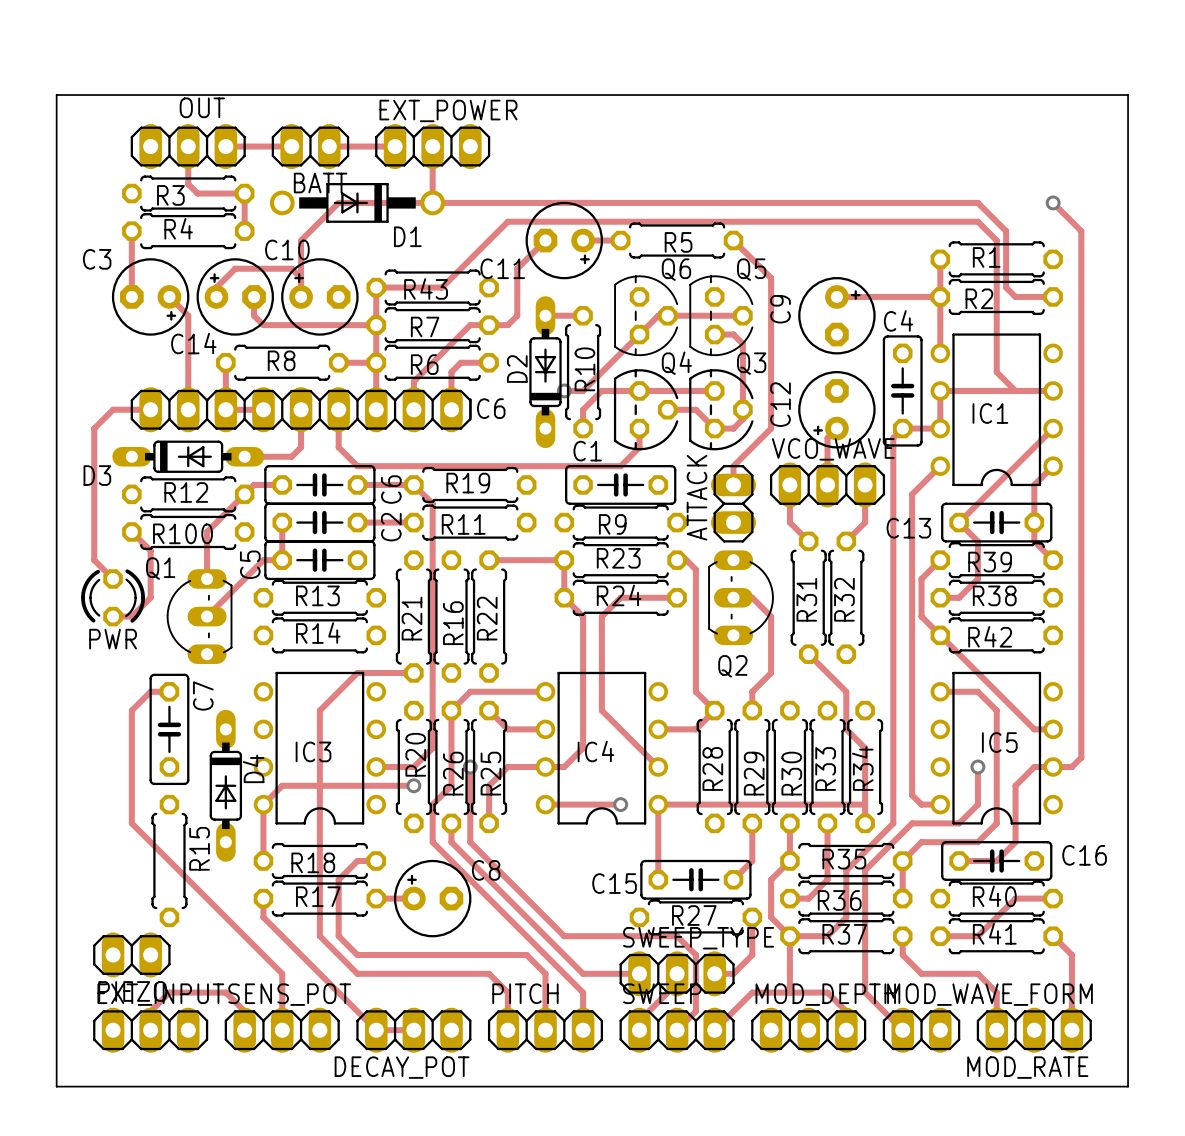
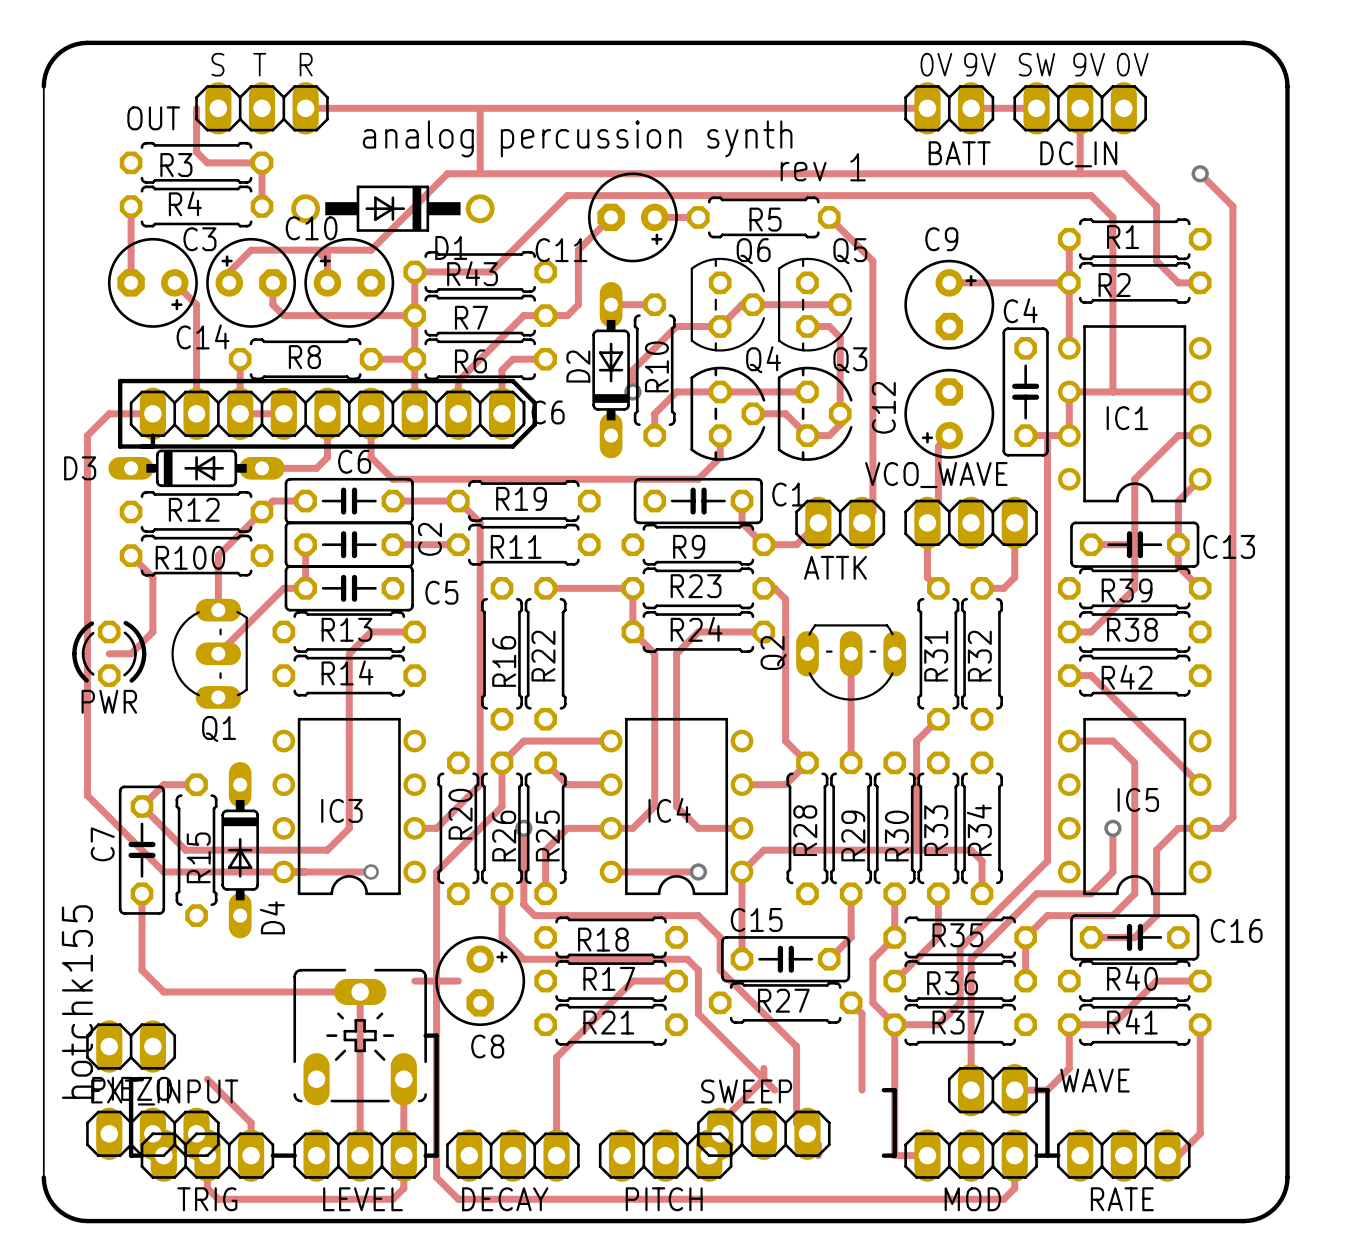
OUT name position: OUT (202, 107) -> OUT (153, 118)
text: none -> S (217, 64)
text: none -> T (259, 64)
text: none -> R (306, 64)
text: none -> 0V (936, 64)
text: none -> 9V (980, 64)
text: none -> SW (1036, 64)
text: none -> 9V (1089, 64)
text: none -> 0V (1132, 64)
board edge: (56, 127) (56, 95) (1128, 95) (1128, 1086) (56, 1086) (56, 1067) -> (43, 86) (47, 69) (56, 55) (70, 46) (87, 42) (1243, 42) (1260, 46) (1274, 55) (1284, 69) (1287, 86) (1287, 1177) (1284, 1194) (1274, 1208) (1260, 1217) (1243, 1221) (87, 1221) (70, 1217) (56, 1208) (47, 1194) (43, 1177)
OUT position: (188, 146) -> (262, 108)
track: (225, 146) (282, 146) -> none
track: none -> (316, 108) (360, 108)
BATT: (310, 146) -> none
track: none -> (436, 108) (927, 108)
EXT_POWER: (432, 146) -> none
BATT: none -> (949, 108)
track: none -> (971, 108) (1036, 108)
track: none -> (1080, 108) (1080, 173)
DC_IN: none -> (1080, 108)
text: none -> analog percussion synth (577, 138)
text: none -> rev 1 (823, 167)
D1 position: (357, 202) -> (392, 208)
track: (404, 202) (338, 202) (301, 240) (301, 268) -> (447, 173) (371, 250) (316, 250)
track: (977, 202) (1006, 231) (1006, 287) (1015, 296) (1034, 296) -> (1112, 173) (1123, 173) (1156, 206) (1156, 261) (1178, 282)
track: (959, 221) (977, 221) (996, 240) (996, 372) (1015, 390) -> (1091, 195) (1112, 217) (1112, 391)
C3 name position: C3 (97, 259) -> C3 (199, 239)
Q6 name position: Q6 (676, 269) -> Q6 (753, 251)
C9 name rotation: 0° (780, 309) -> 90° clockwise (941, 239)
C9 name position: C9 (780, 309) -> C9 (941, 239)
track: (639, 334) (583, 390) (564, 390) -> (720, 326) (676, 326) (632, 370) (632, 391)
line: none -> (120, 381) (512, 381) (534, 402) (534, 424) (512, 446) (120, 446) (120, 381)
line: none -> (152, 435) (152, 446)
track: (771, 428) (733, 466) (733, 484) -> (872, 435) (872, 511) (862, 522)
track: (902, 428) (893, 437) (893, 503) -> none
track: (1053, 428) (959, 522) (977, 541) (977, 578) -> (1200, 435) (1178, 435) (1134, 479) (1134, 588) (1112, 610)
VCO_WAVE name position: VCO_WAVE (833, 449) -> VCO_WAVE (936, 475)
C1 name position: C1 (587, 451) -> C1 (788, 494)
track: (940, 466) (912, 494) (912, 795) (921, 804) (940, 804) -> none
D3 name position: D3 (97, 475) -> D3 (80, 468)
track: none -> (742, 501) (742, 522) (763, 544) (796, 544) (818, 522)
track: (789, 484) (789, 522) (808, 541) -> none
VCO_WAVE position: (827, 484) -> (971, 522)
track: (865, 484) (865, 522) (846, 541) -> none
C6 name rotation: 0° (391, 489) -> 90° clockwise (354, 461)
C6 name position: C6 (391, 489) -> C6 (354, 461)
ATTACK: (733, 503) -> none
ATTK: none -> (840, 522)
track: none -> (927, 522) (927, 577) (938, 588)
track: none -> (1091, 544) (1134, 544)
C2 name position: C2 (391, 527) -> C2 (430, 539)
C13 name position: C13 (908, 528) -> C13 (1229, 546)
track: (893, 550) (893, 823) -> (1047, 653) (1047, 861) (1014, 893)
track: none -> (1014, 577) (1003, 588) (982, 588)
track: (94, 560) (113, 578) -> (87, 588) (87, 795) (163, 871) (371, 871)
track: (940, 560) (921, 578) -> (1047, 435) (1047, 610)
C5 name rotation: 0° (250, 564) -> 90° clockwise (441, 592)
C5 name position: C5 (250, 564) -> C5 (441, 592)
Q1 name position: Q1 (160, 568) -> Q1 (219, 729)
PWR position: (113, 597) -> (109, 653)
track: (733, 597) (752, 597) (771, 616) (771, 672) (752, 691) -> (851, 653) (851, 741)
Q2 rotation: 0° (741, 597) -> 90° clockwise (851, 662)
R31 position: (808, 597) -> (938, 653)
R32 position: (846, 597) -> (982, 653)
R21 rotation: 0° (413, 616) -> 90° clockwise (611, 1024)
R21 position: (413, 616) -> (611, 1024)
track: (921, 616) (1034, 729) (1053, 729) -> (1069, 675) (1091, 675) (1200, 784)
track: (808, 654) (846, 691) (846, 729) (865, 748) (865, 795) -> none
track: (413, 672) (357, 672) (319, 710) -> (414, 631) (371, 631) (349, 653) (349, 762)
track: none -> (938, 719) (916, 741) (916, 850)
track: (169, 691) (150, 691) (131, 710) (131, 823) (282, 973) (282, 1030) -> none
C7 name position: C7 (203, 695) -> C7 (102, 844)
track: (601, 710) (658, 766) -> (676, 762) (676, 806) (698, 828) (742, 828)
C7 rotation: 0° (169, 729) -> 180° (141, 850)
track: (432, 729) (432, 748) (413, 766) (395, 766) -> (480, 784) (436, 828)
track: (451, 748) (451, 785) (432, 804) (432, 842) (451, 860) -> (502, 915) (502, 937)
track: none -> (502, 806) (436, 871) (436, 1177) (458, 1199) (1003, 1199) (1014, 1188) (1014, 1155)
track: (319, 766) (319, 936) (357, 973) (489, 973) (507, 992) (507, 1030) -> none
D4 name position: D4 (253, 768) -> D4 (272, 917)
track: (282, 785) (263, 804) (263, 860) -> (305, 850) (185, 850) (141, 806) (163, 784) (196, 784)
track: (301, 785) (413, 785) -> (327, 850) (349, 828)
via: (413, 785) -> none
via: none -> (371, 871)
track: (658, 804) (865, 804) -> (742, 871) (763, 850) (971, 850) (982, 861)
track: none -> (141, 893) (141, 970) (163, 991) (360, 991) (360, 1155)
track: (470, 832) (470, 842) (564, 936) (677, 936) (695, 955) (695, 1011) (677, 1030) -> (523, 904) (534, 915) (698, 915) (720, 937) (720, 970) (796, 1046) (796, 1122) (818, 1144) (818, 1155)
track: (451, 842) (583, 973) (639, 973) -> none
R15 name position: R15 (199, 848) -> R15 (198, 857)
R15 position: (169, 860) -> (196, 850)
R18 position: (319, 860) -> (611, 937)
track: (376, 860) (357, 860) (338, 879) (338, 936) (357, 955) (526, 955) (545, 973) (545, 1030) -> none
track: (827, 860) (827, 879) (808, 898) (789, 898) -> (938, 937) (894, 981)
track: (865, 870) (865, 992) (902, 1030) -> (982, 948) (971, 959) (971, 1090)
track: (470, 879) (583, 992) (583, 1030) -> (523, 959) (687, 959) (698, 970) (698, 1013) (774, 1090)
C15 name position: C15 (614, 883) -> C15 (756, 919)
track: (263, 898) (263, 917) (376, 1030) (413, 1030) -> none
R17 position: (319, 898) -> (611, 981)
C8 rotation: 0° (432, 898) -> 90° clockwise (480, 981)
track: none -> (676, 981) (632, 981) (556, 1057) (556, 1155)
text: none -> hotchk155 (77, 1002)
track: (752, 917) (752, 955) (733, 973) (714, 973) -> (851, 1002) (862, 1013) (862, 1090)
track: (902, 936) (902, 955) (921, 973) (977, 973) (996, 992) (996, 1030) -> none
track: none -> (1069, 1024) (1069, 1068) (1047, 1090) (1014, 1090)
track: (1053, 936) (1071, 955) (1071, 1030) -> (1200, 1024) (1200, 1133) (1178, 1155) (1167, 1155)
line: none -> (425, 1035) (436, 1035) (436, 1155) (425, 1155)
part: none -> (360, 1037)
SWEEP_TYPE: (677, 973) -> none
line: none -> (141, 1079) (131, 1079) (131, 1155) (141, 1155)
track: none -> (207, 1079) (251, 1122) (251, 1155)
track: none -> (403, 1079) (403, 1188) (392, 1199) (218, 1199) (207, 1188) (207, 1155)
line: none -> (883, 1090) (894, 1090) (894, 1155) (883, 1155)
track: none -> (894, 1090) (894, 1155) (927, 1155)
WAVE: none -> (992, 1090)
line: none -> (1036, 1090) (1047, 1090) (1047, 1155)
PITCH name position: PITCH (525, 993) -> PITCH (664, 1199)
track: (150, 1030) (150, 1011) (169, 992) (225, 992) (244, 1011) (244, 1030) -> none
SENS_POT: (282, 1030) -> none
DECAY_POT: (413, 1030) -> none
PITCH position: (545, 1030) -> (665, 1155)
track: (714, 1030) (752, 992) (827, 992) (846, 1011) (846, 1030) -> none
MOD_DEPTH: (808, 1030) -> none
MOD_WAVE_FORM: (921, 1030) -> none
MOD_RATE: (1034, 1030) -> none
TRIG: none -> (207, 1155)
line: none -> (272, 1155) (294, 1155)
LEVEL: none -> (360, 1155)
DECAY: none -> (512, 1155)
MOD: none -> (971, 1155)
line: none -> (1036, 1155) (1058, 1155)
RATE: none -> (1123, 1155)

